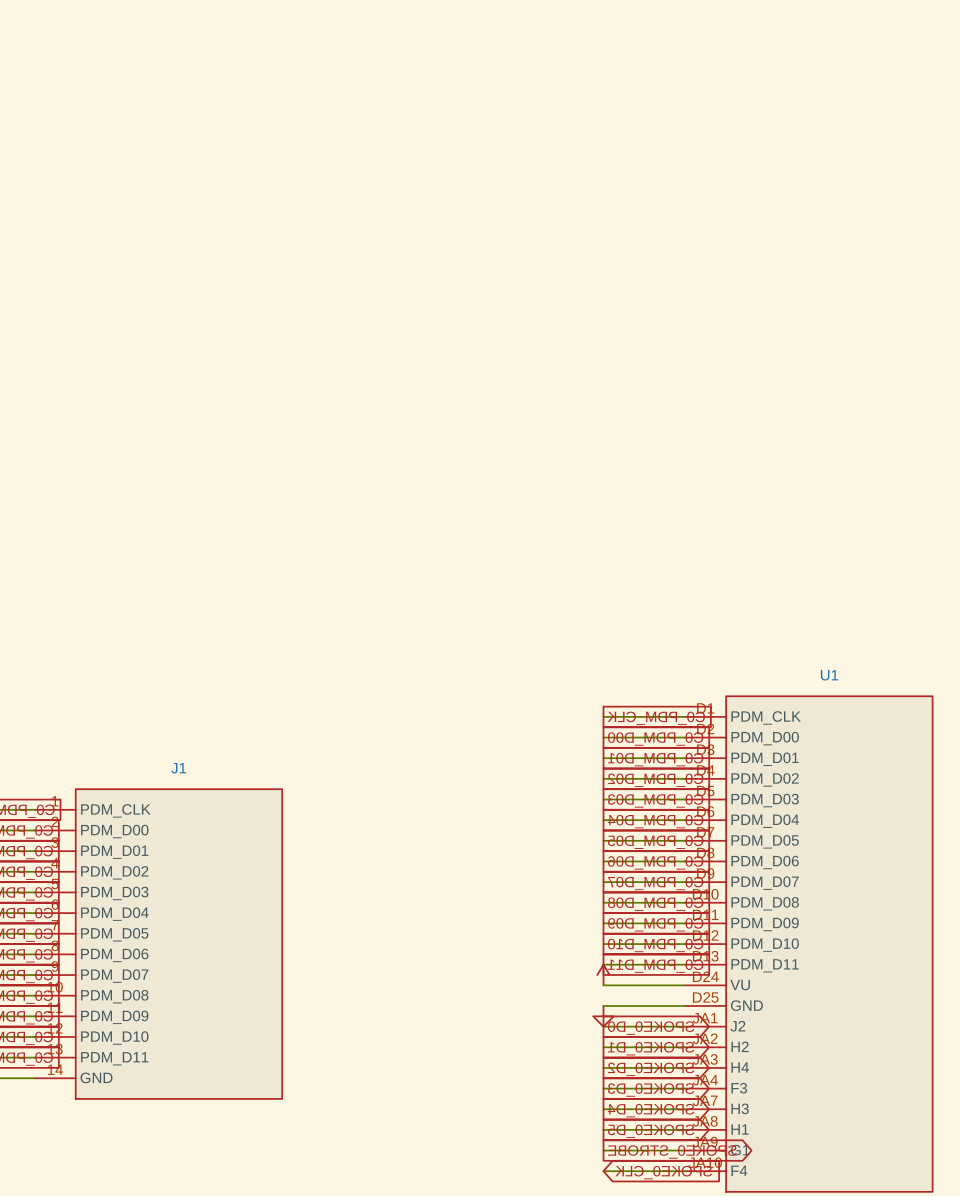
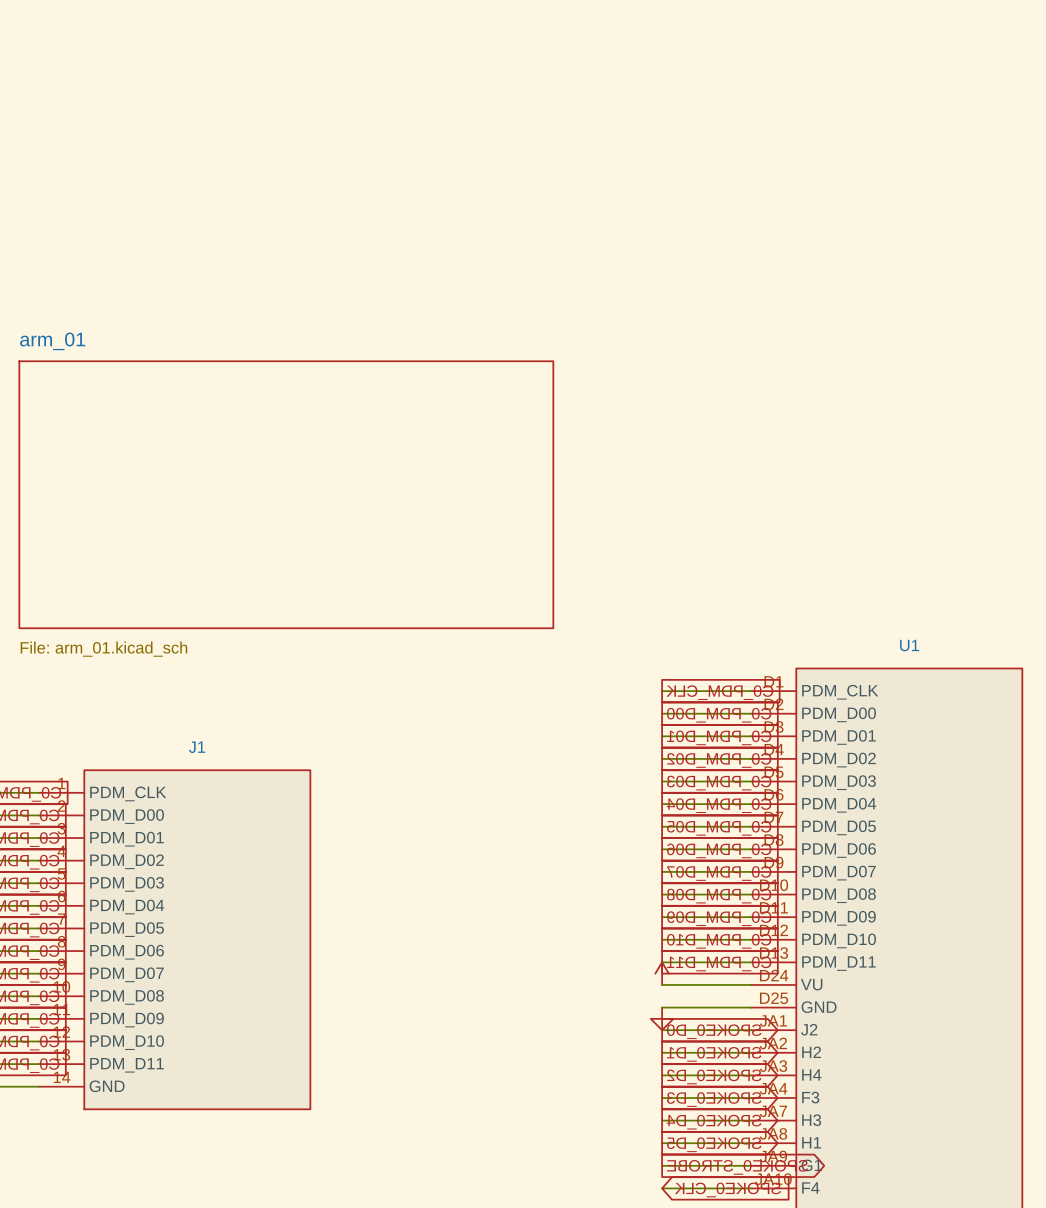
sheet arm_01: none -> File: arm_01.kicad_sch (286, 494)

